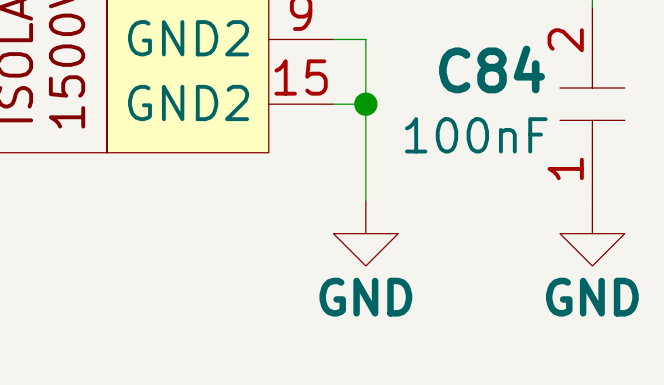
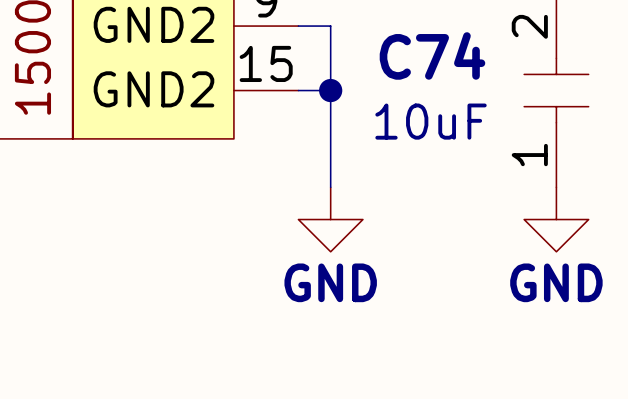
C84 name: C84 (492, 69) -> C74 (432, 55)
C84 value: 100nF (476, 135) -> 10uF (431, 121)

